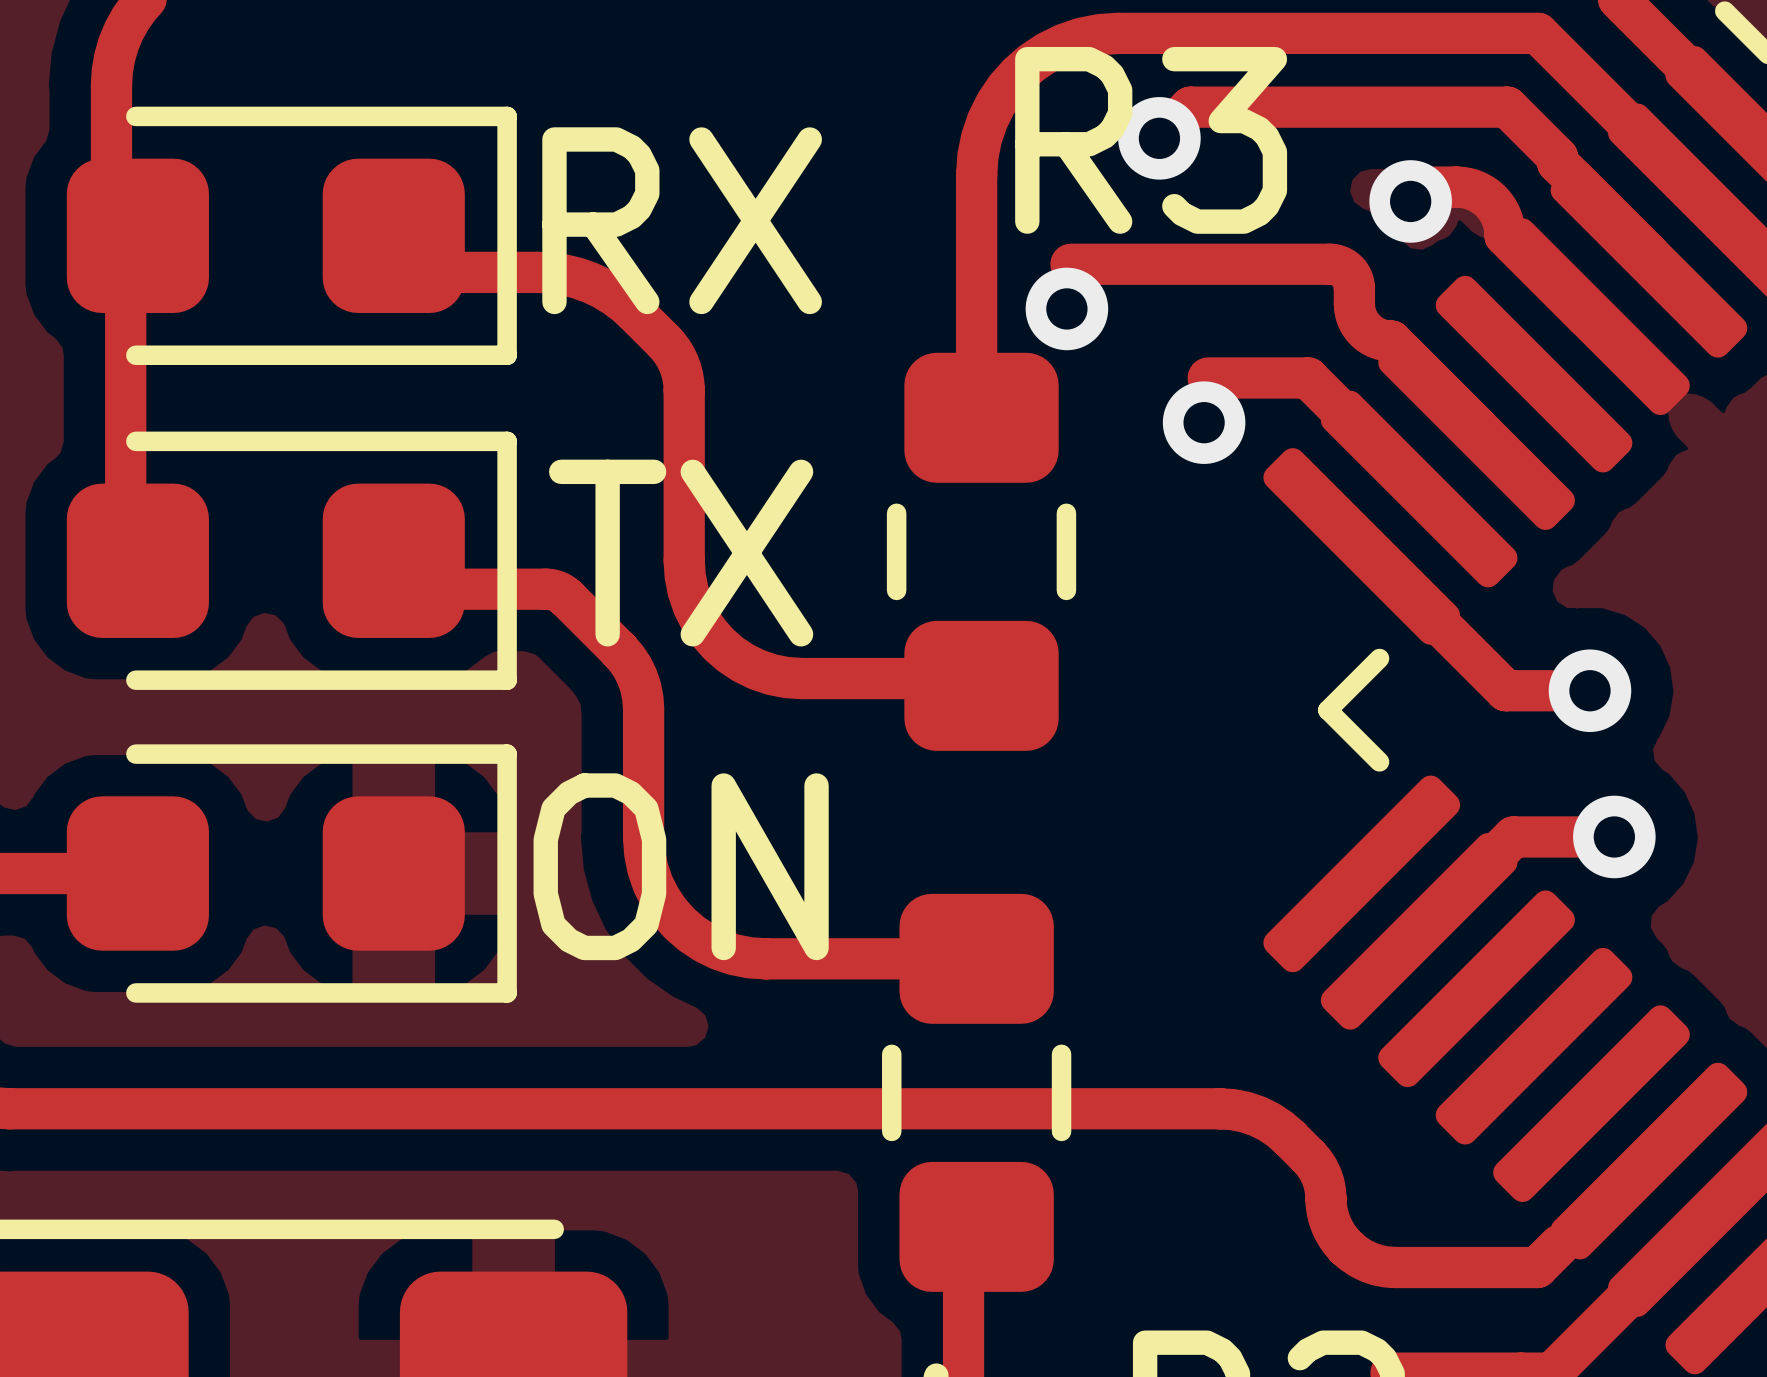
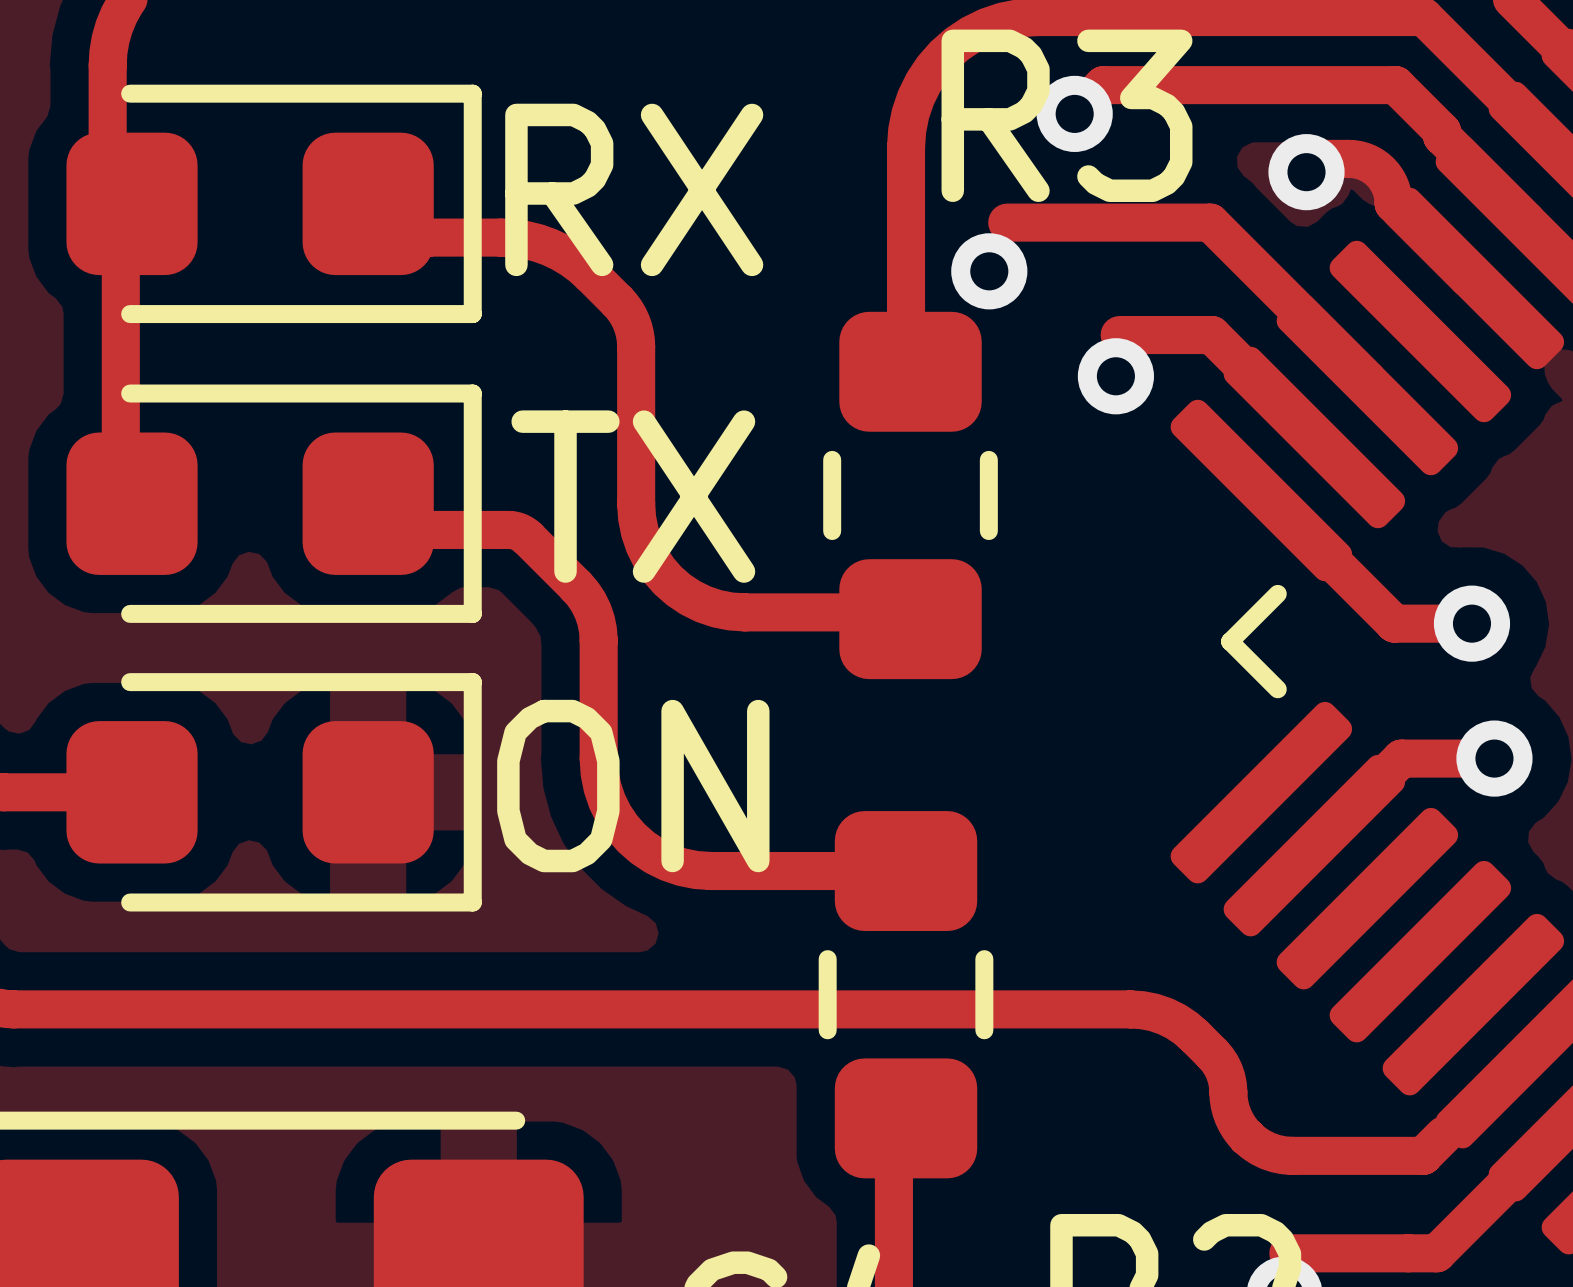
track: (1070, 264) (1336, 265) (1347, 271) (1352, 279) (1355, 313) (1362, 326) (1377, 338) (1391, 341) -> (1007, 222) (1210, 222) (1288, 300)

